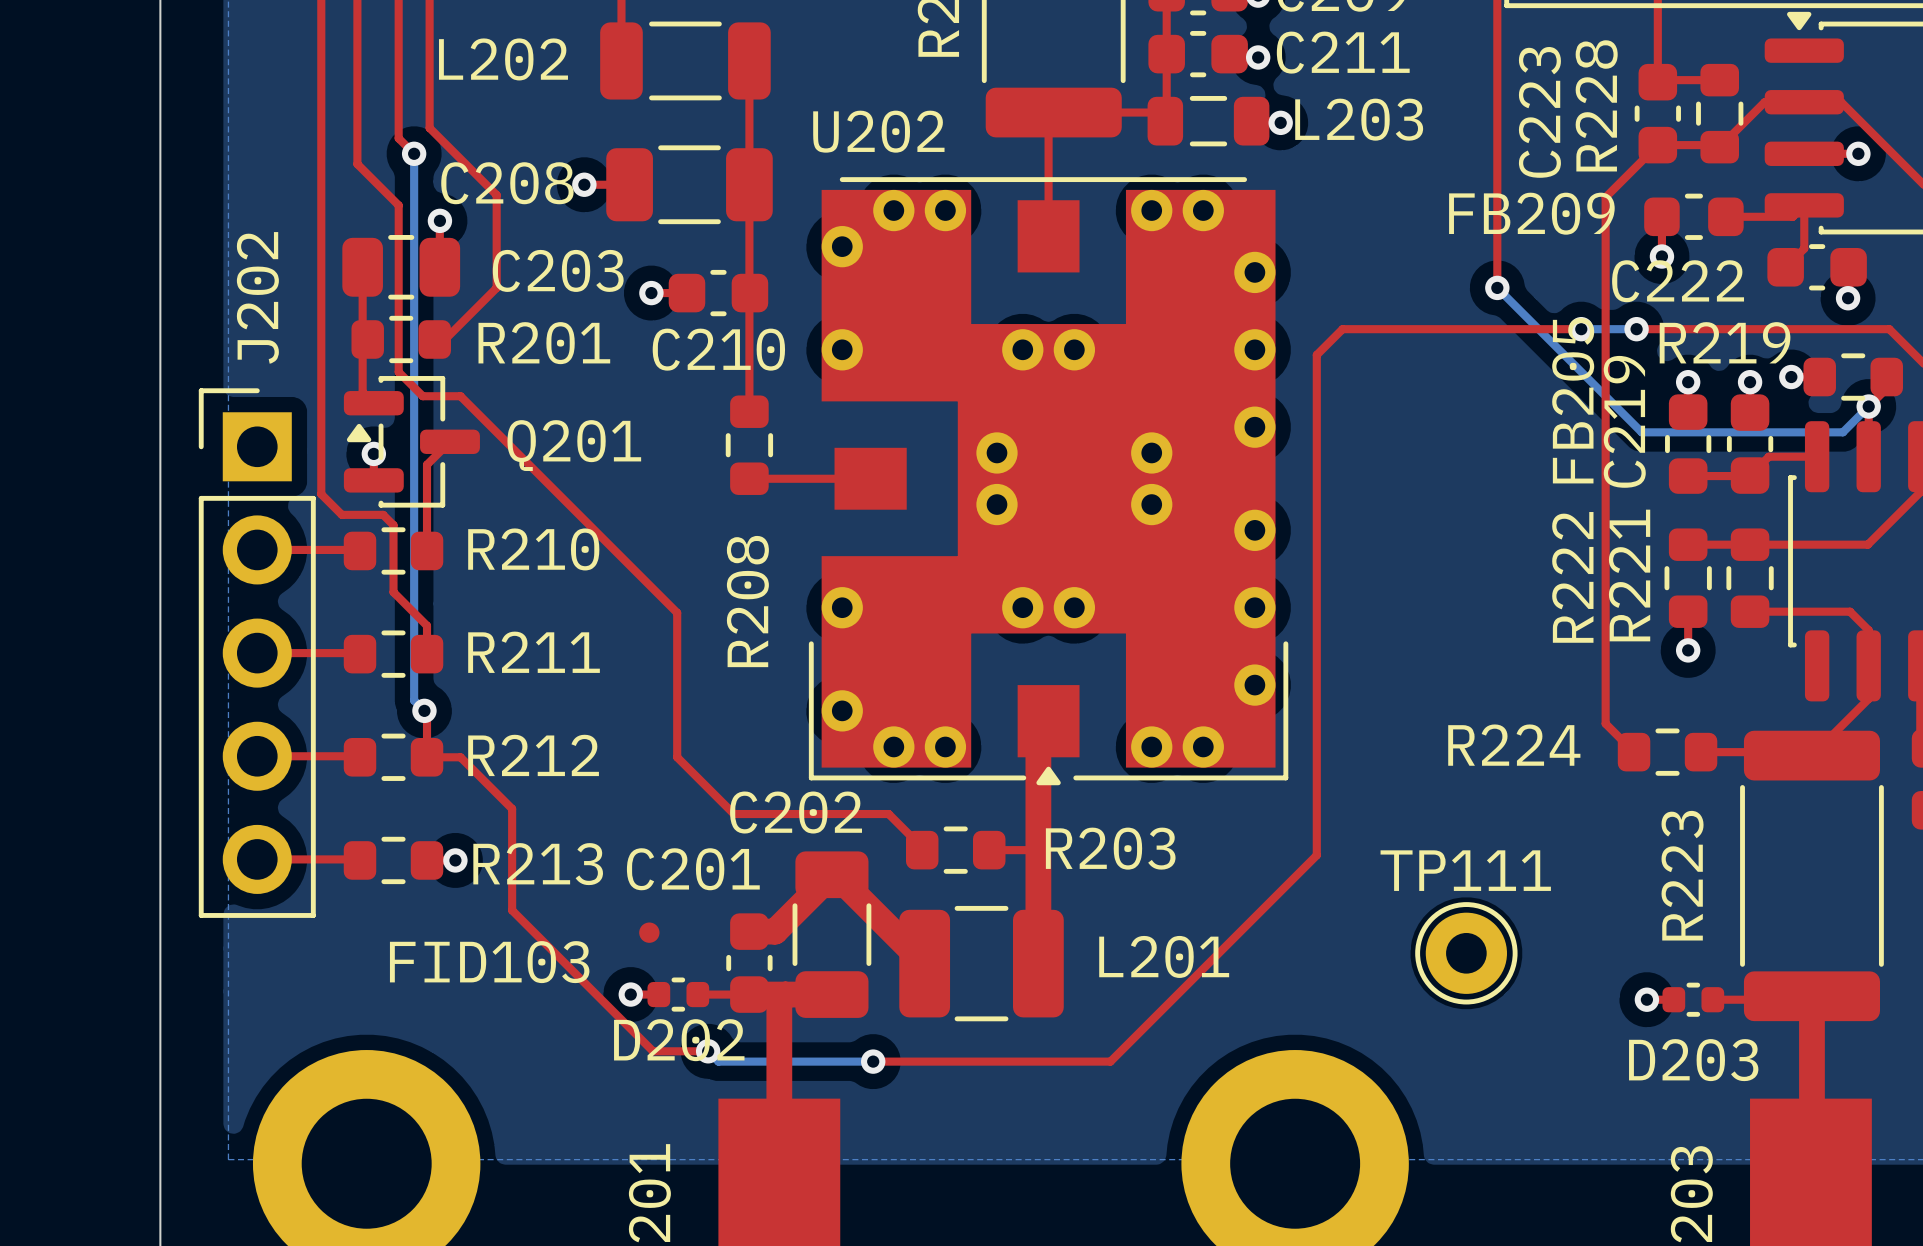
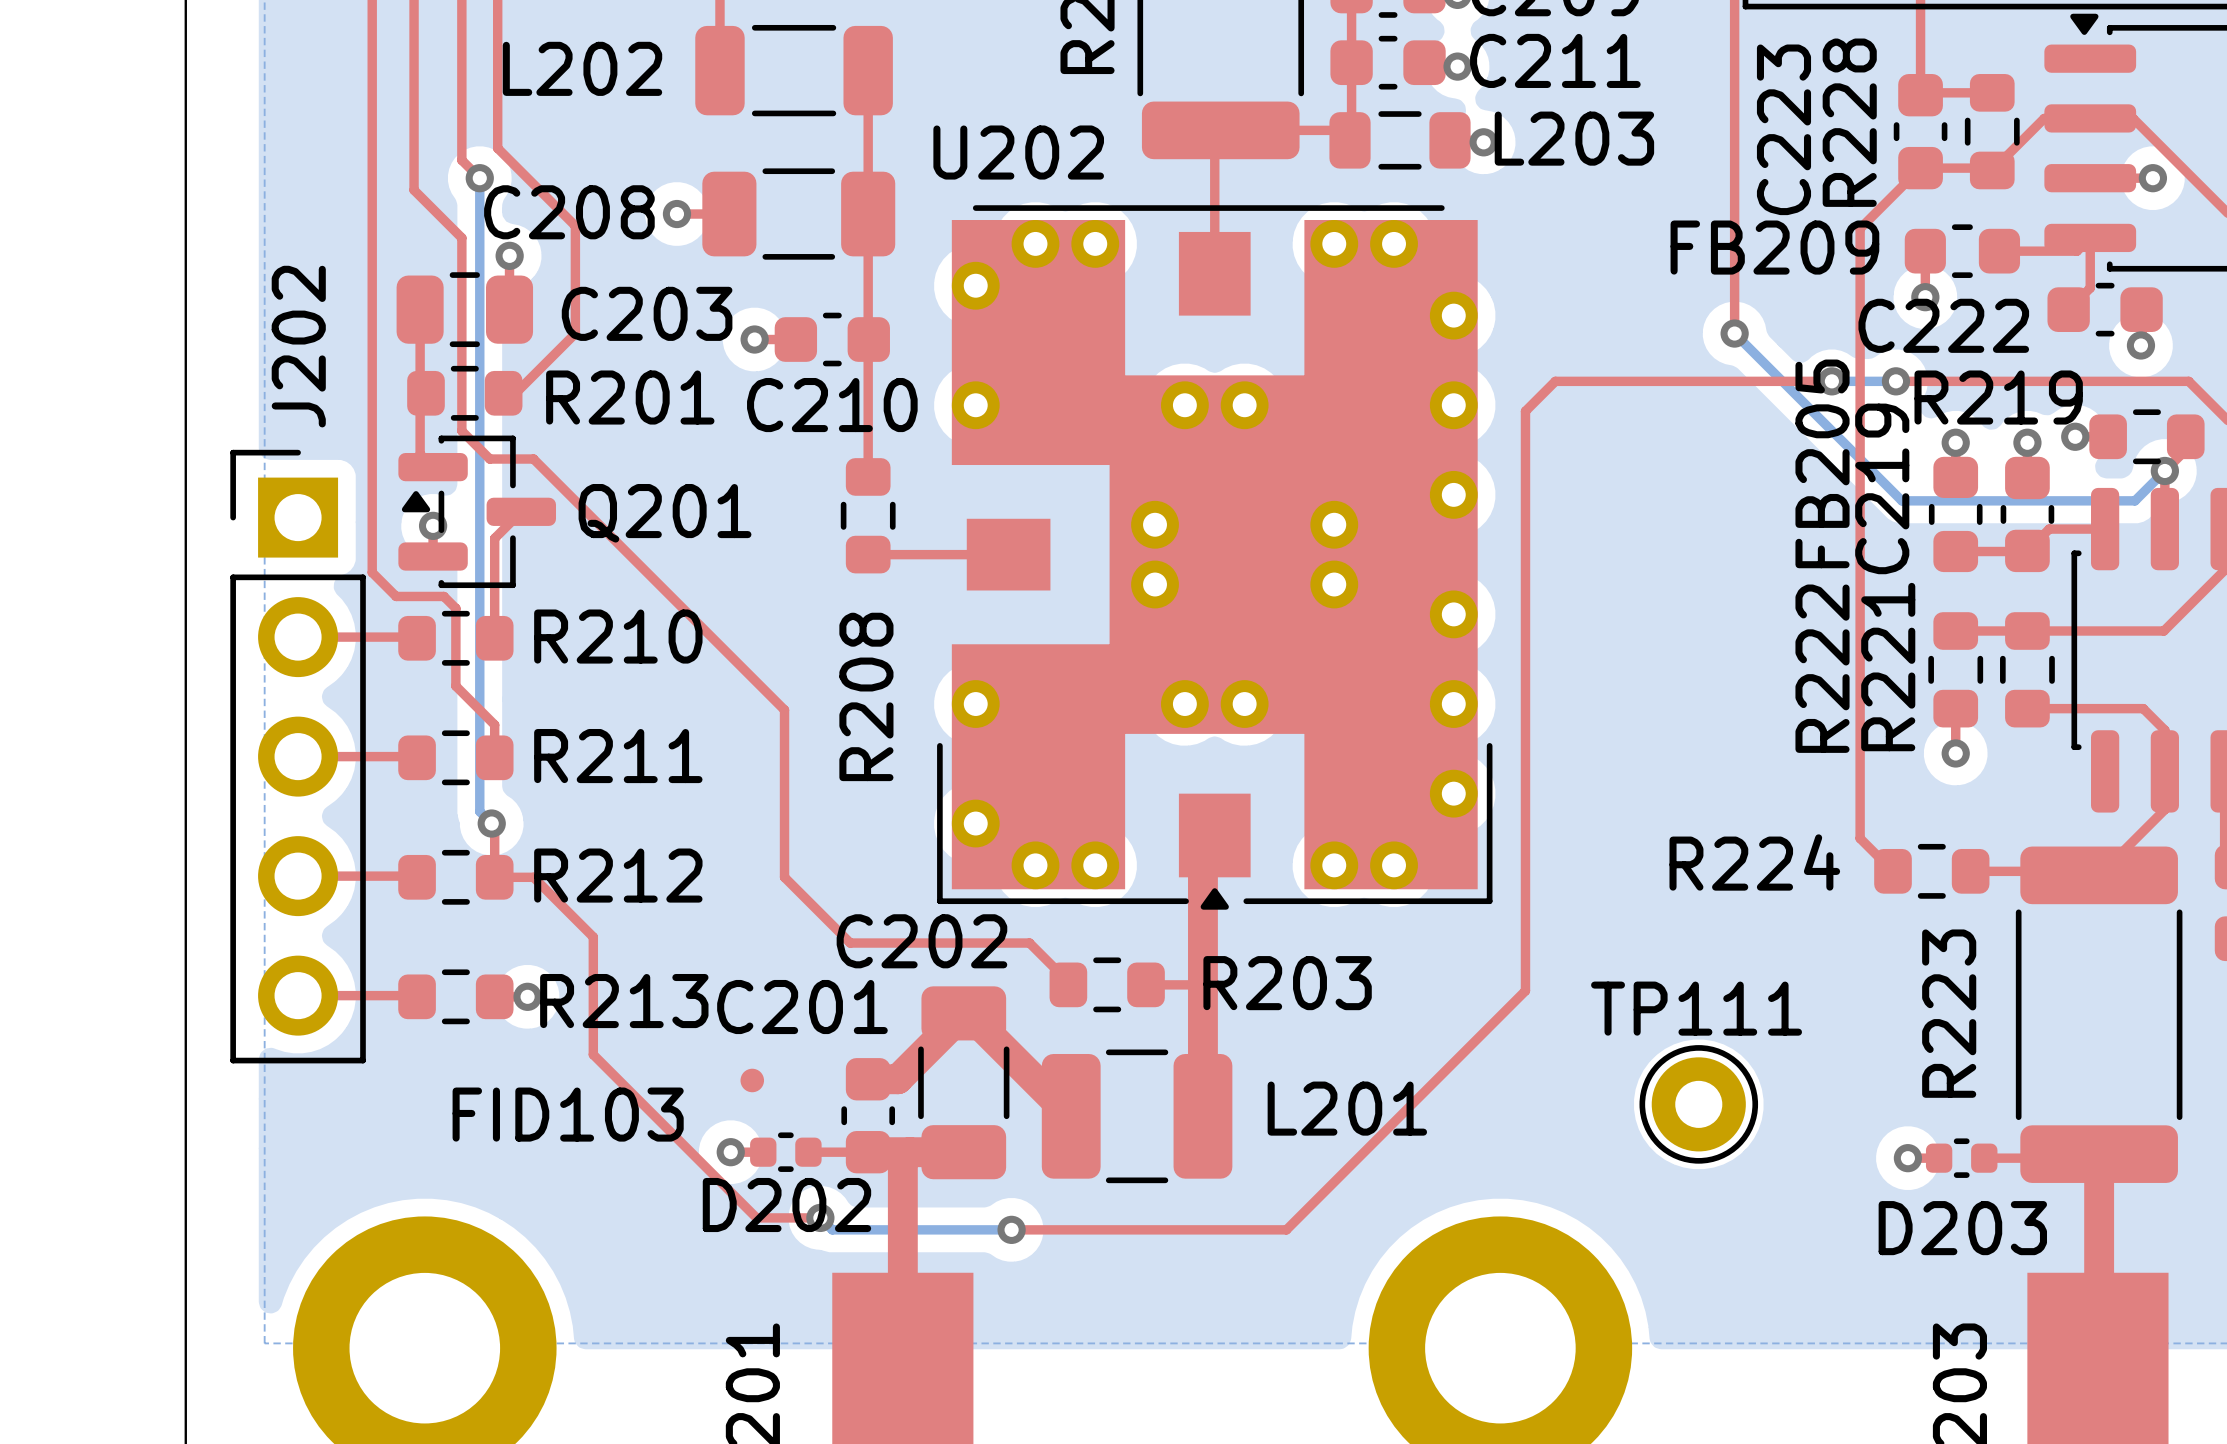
C208 name position: C208 (507, 183) -> C208 (569, 212)

